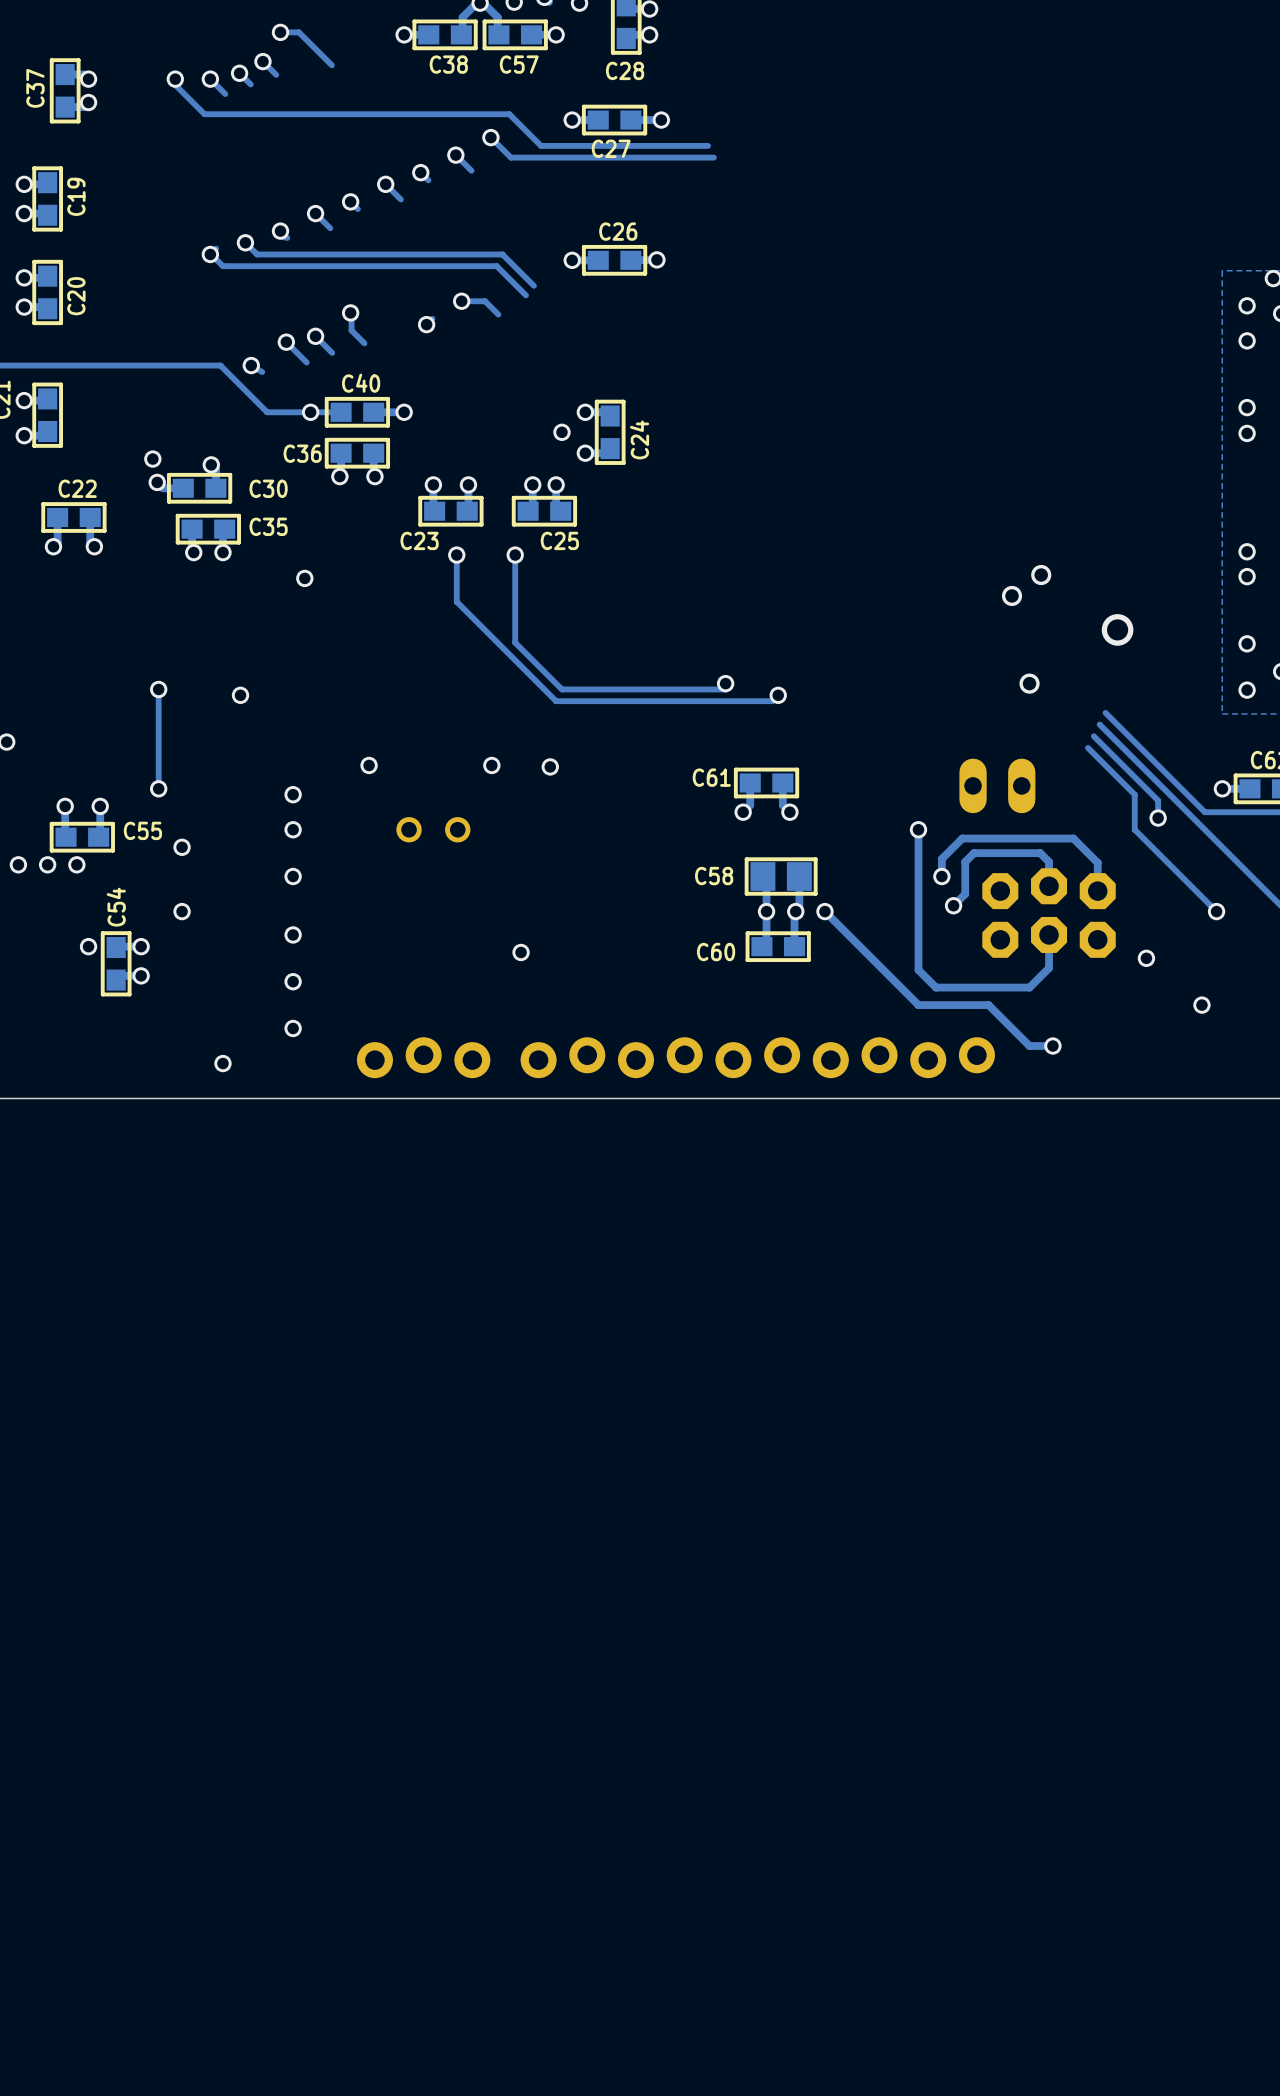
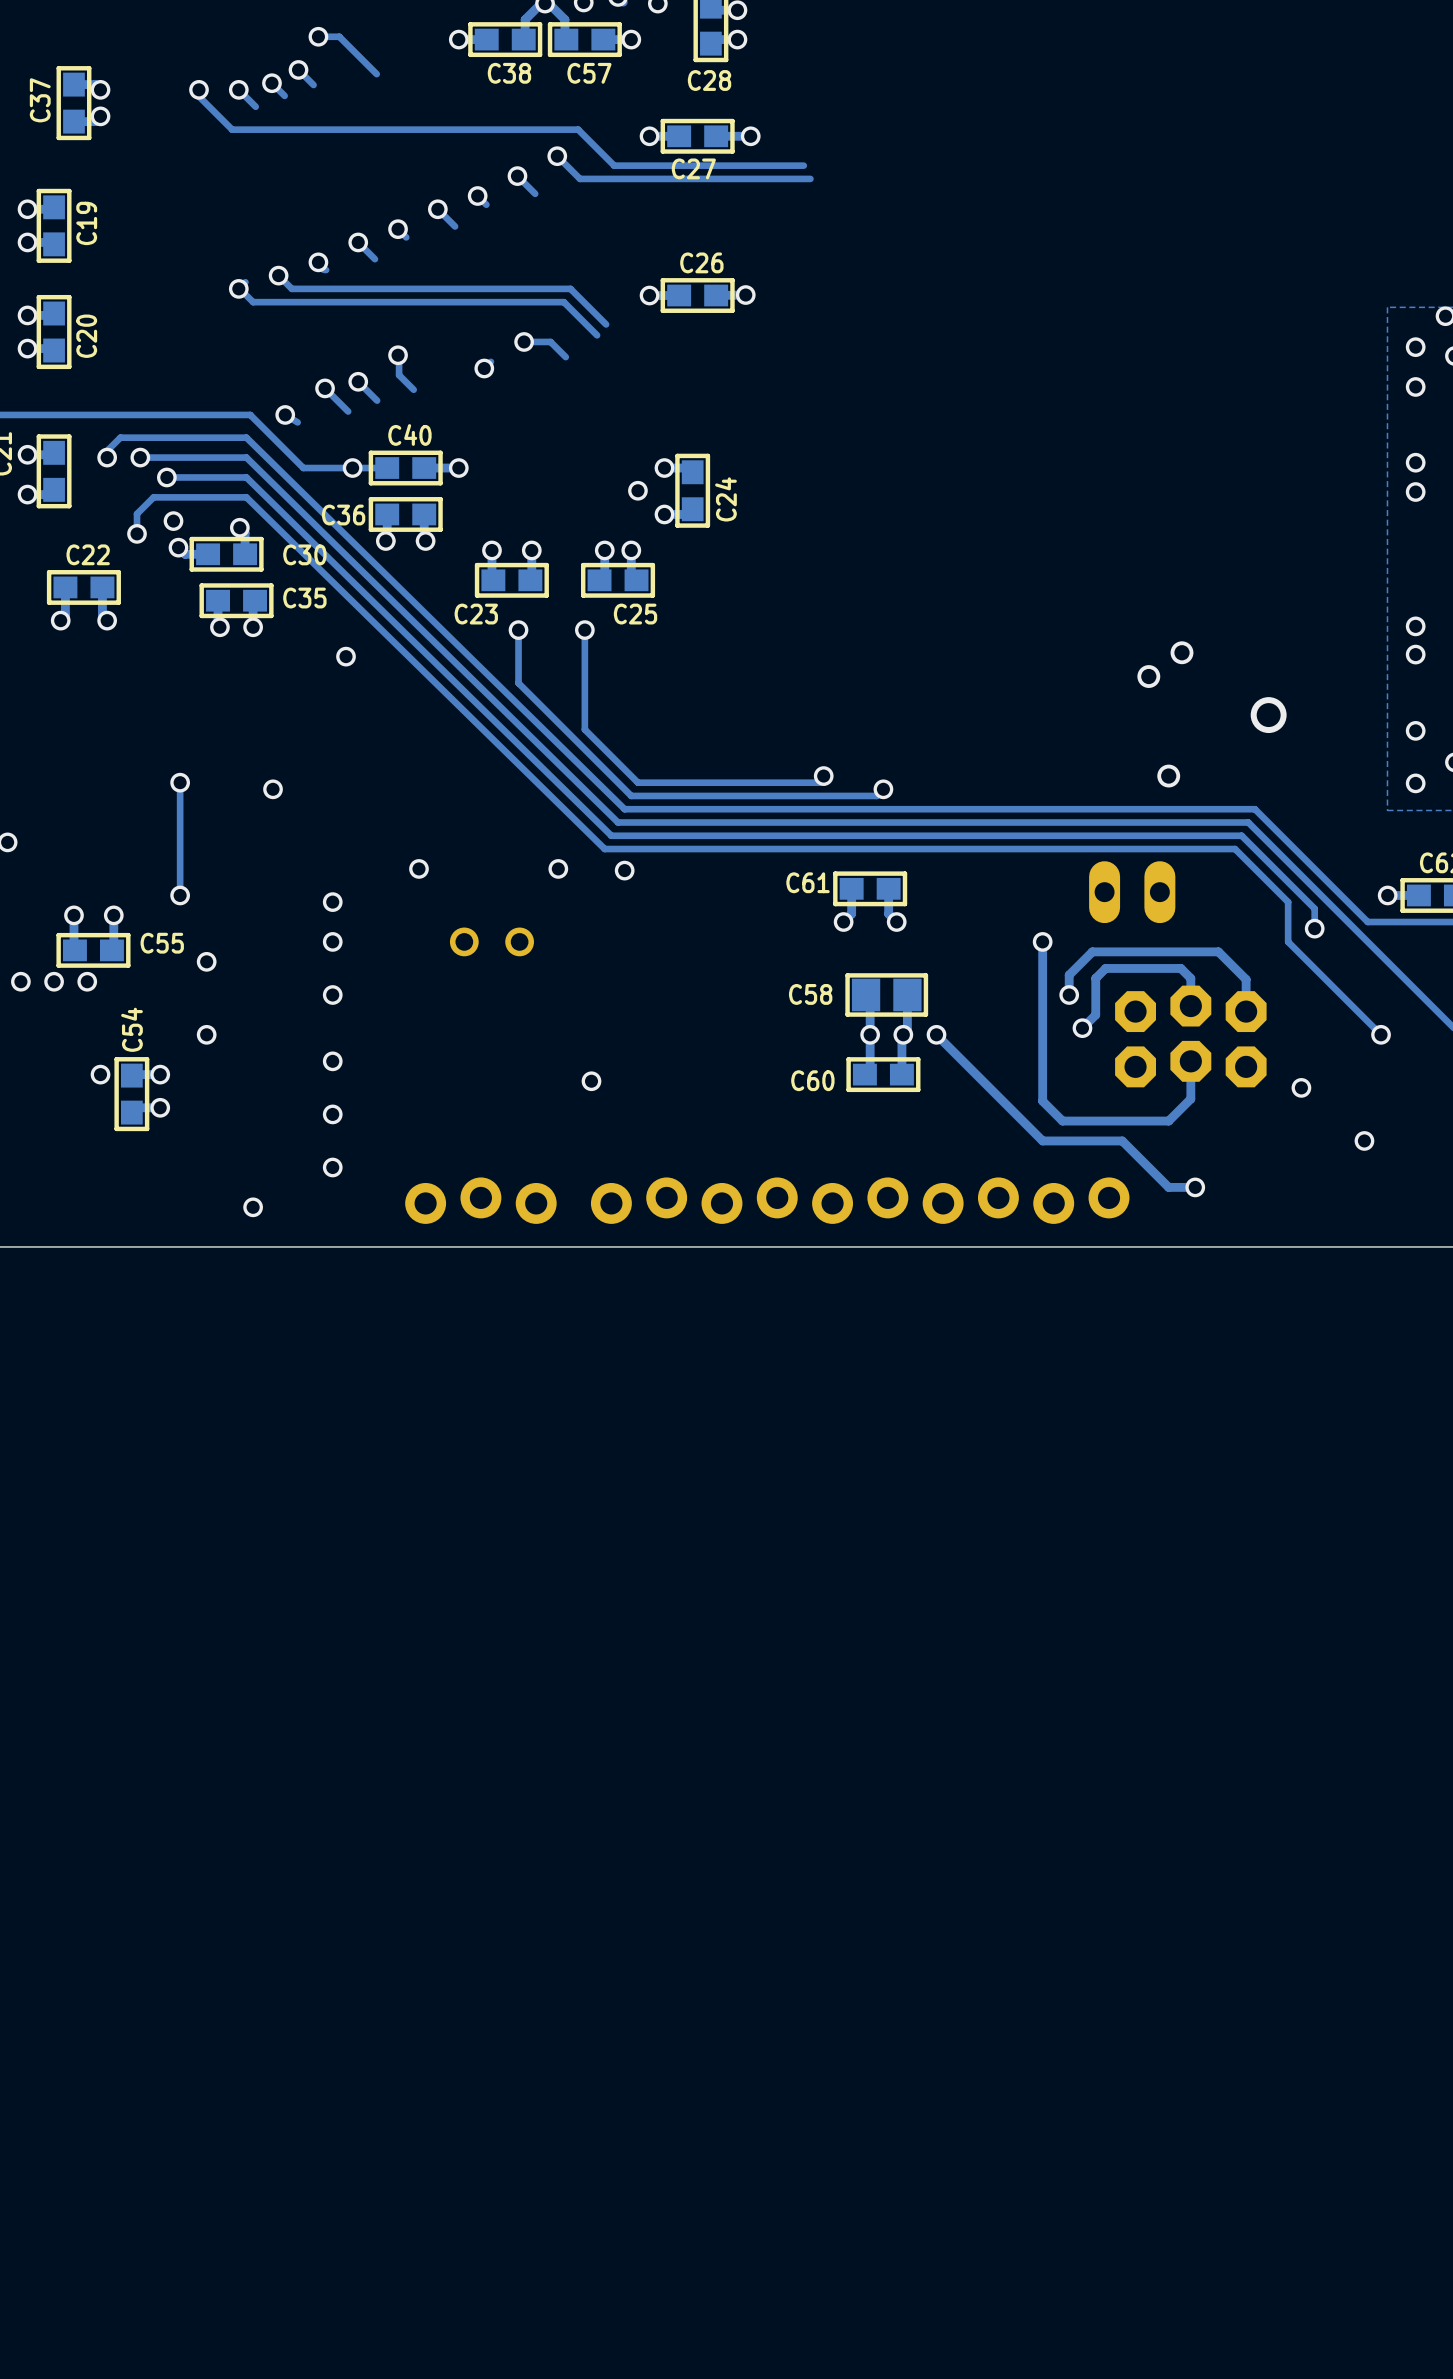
track: none -> (107, 457) (107, 450) (120, 437) (246, 437) (624, 809) (1254, 809)
via: none -> (107, 457)
track: none -> (140, 457) (246, 457) (618, 822) (1248, 822)
via: none -> (140, 457)
track: none -> (166, 477) (246, 477) (611, 835) (1241, 835)
via: none -> (166, 477)
track: none -> (137, 533) (137, 513) (153, 497) (246, 497) (604, 849) (1235, 849)
via: none -> (137, 533)

